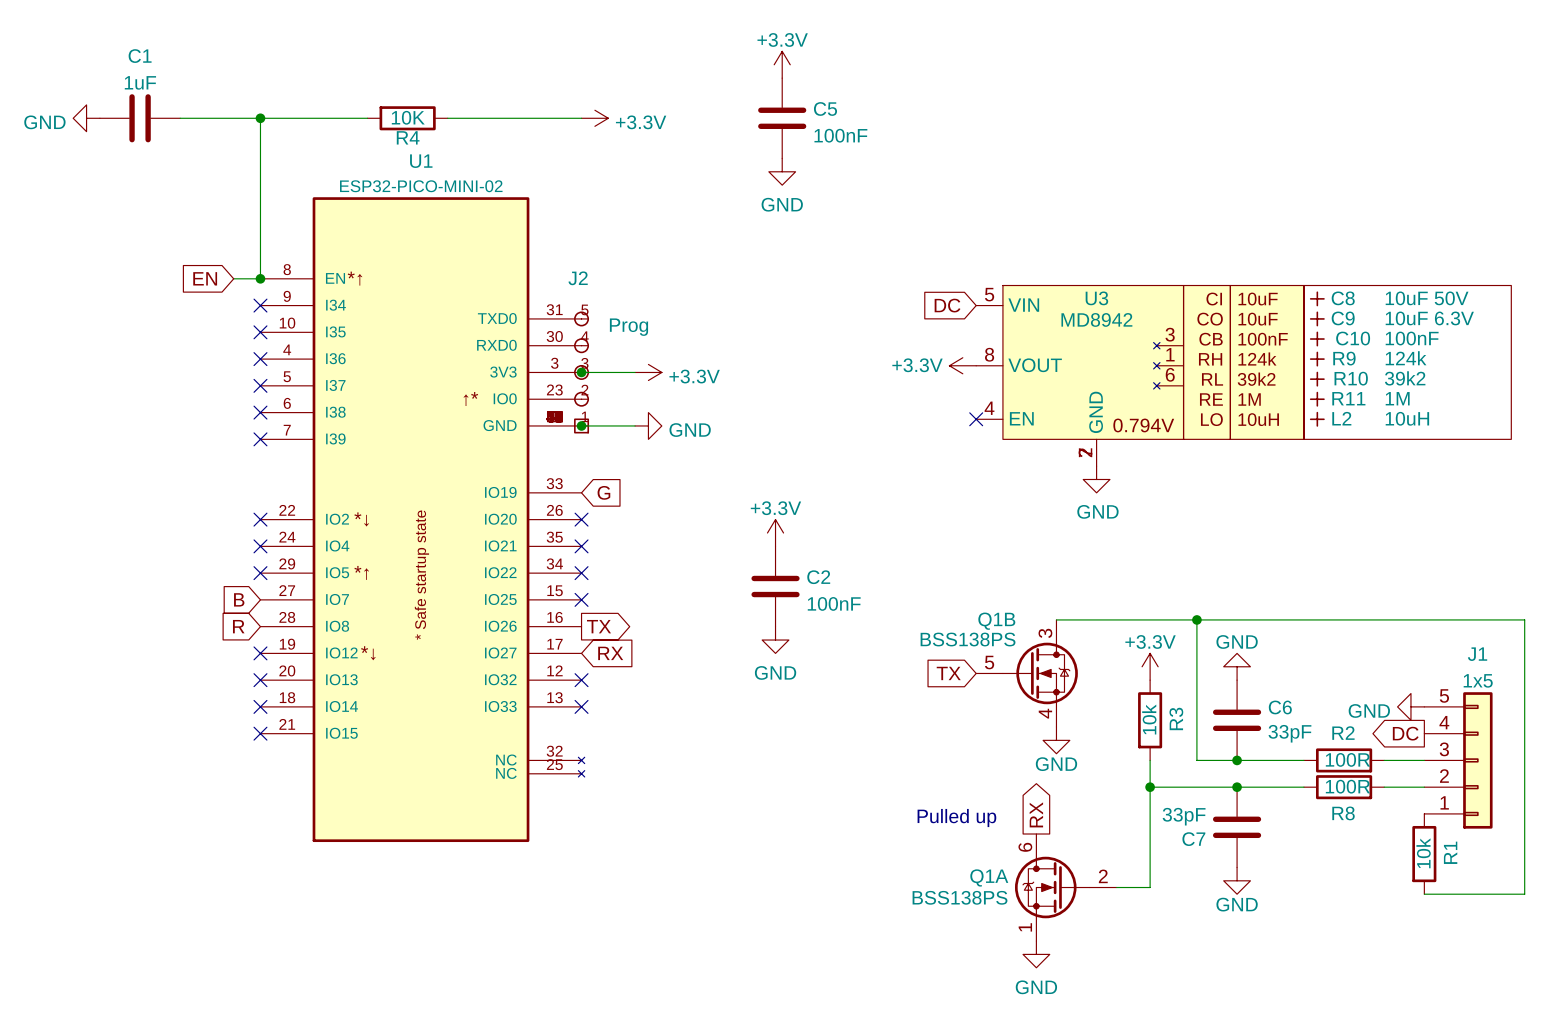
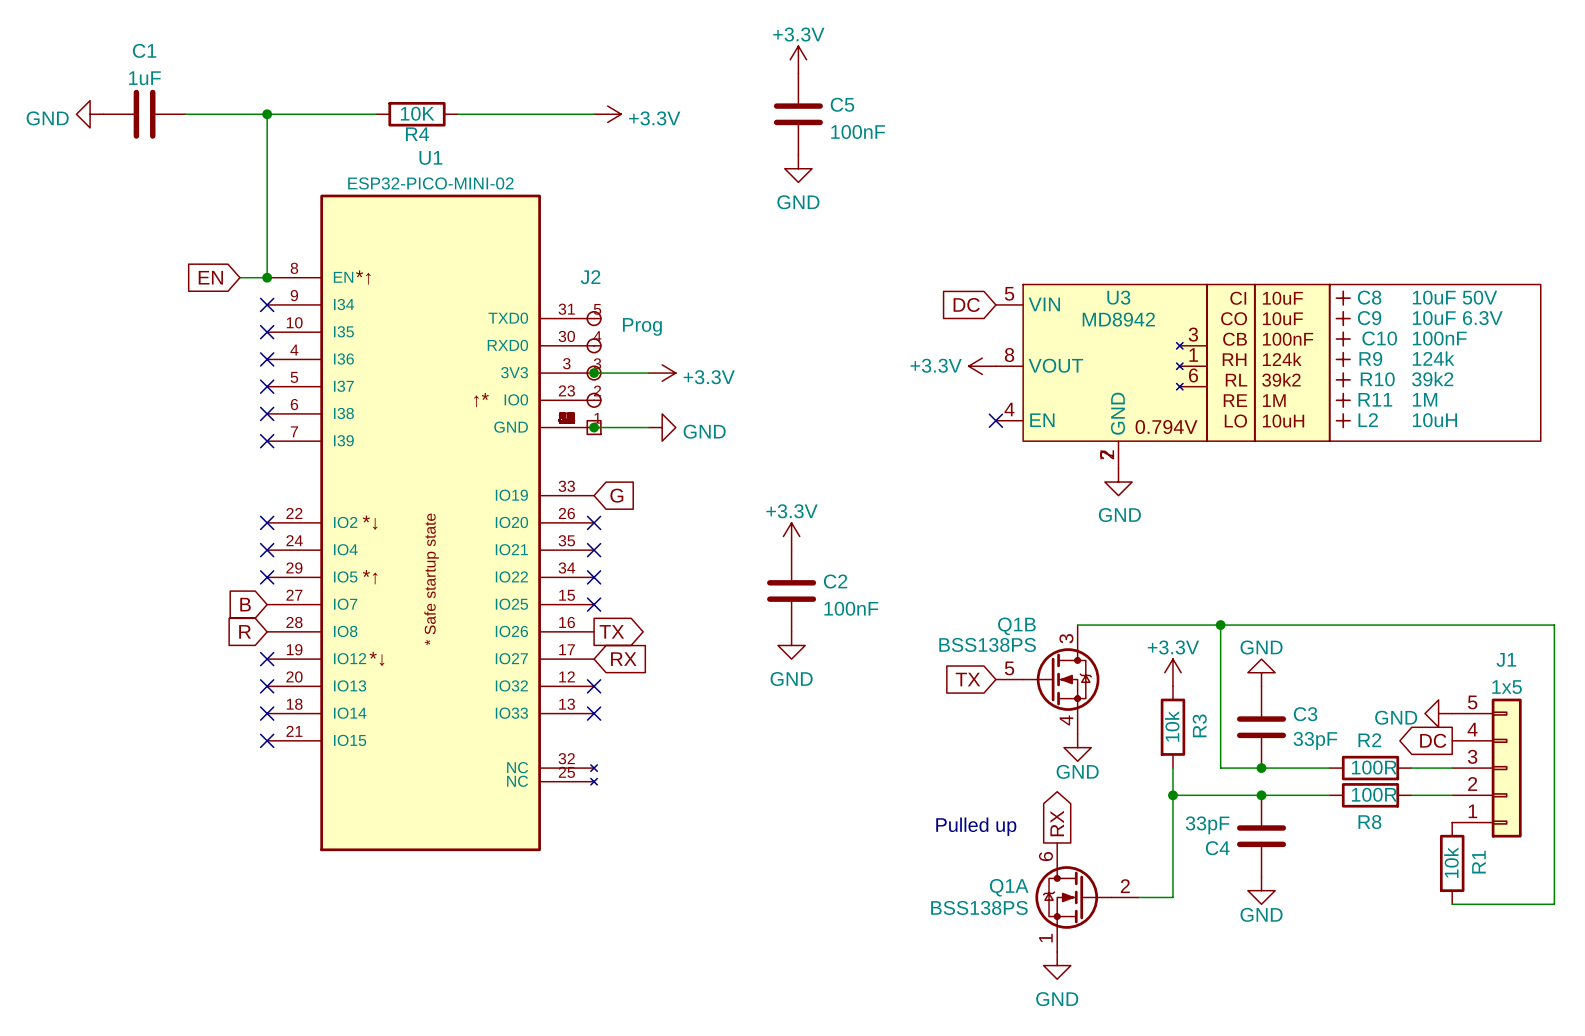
C6 name: C6 (1280, 707) -> C3 (1305, 714)
C7 name: C7 (1193, 839) -> C4 (1217, 848)

